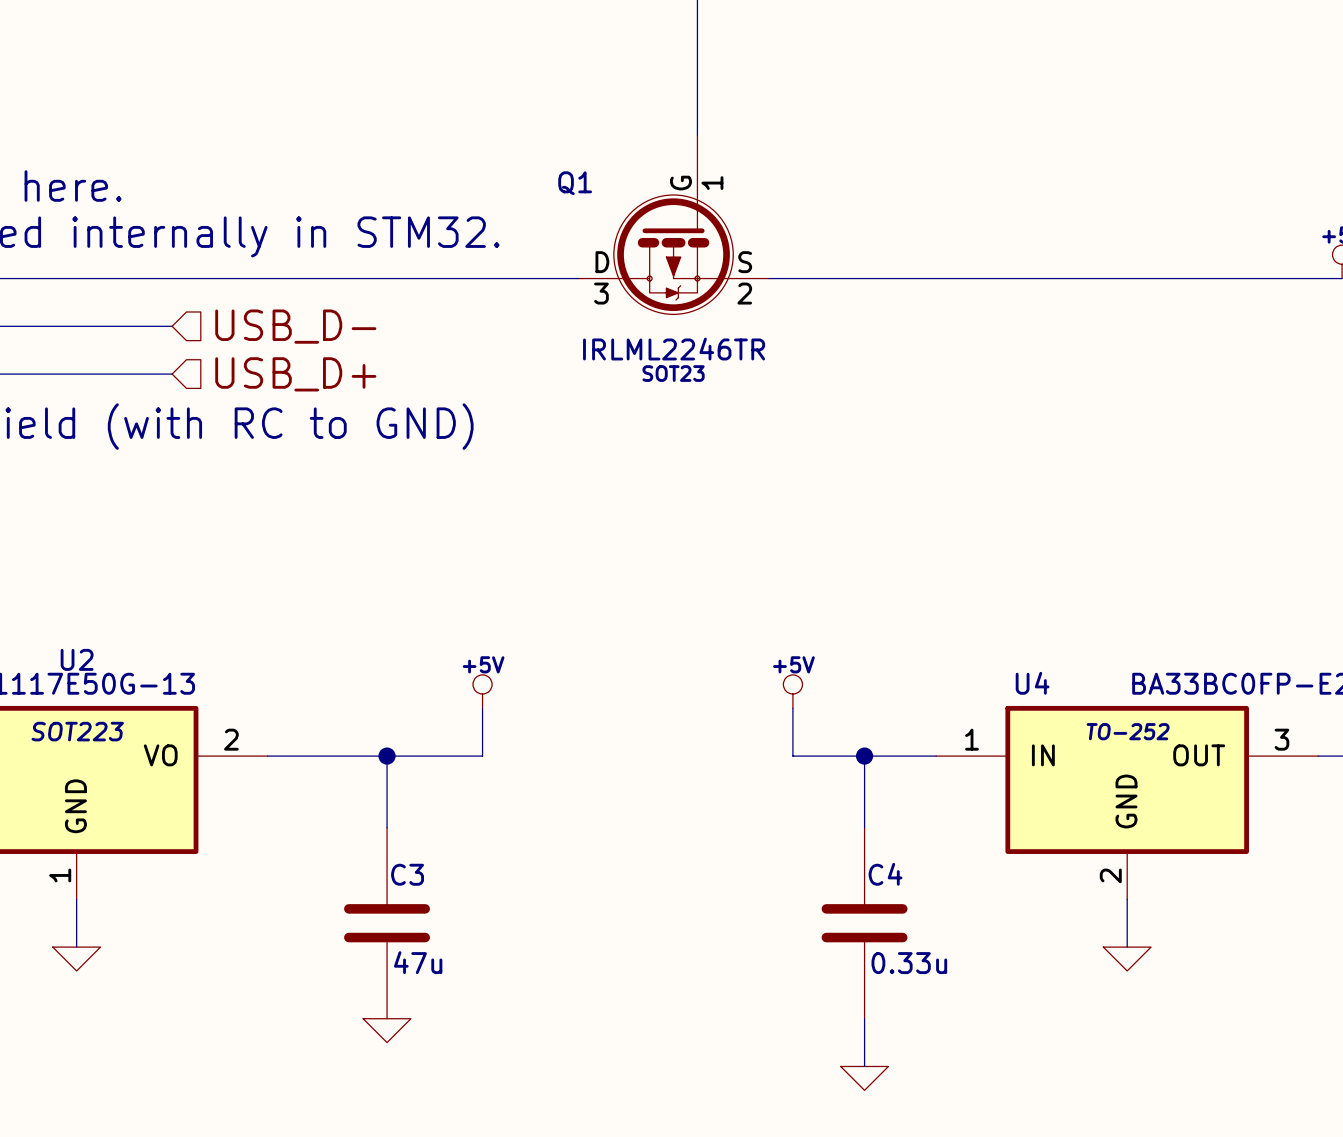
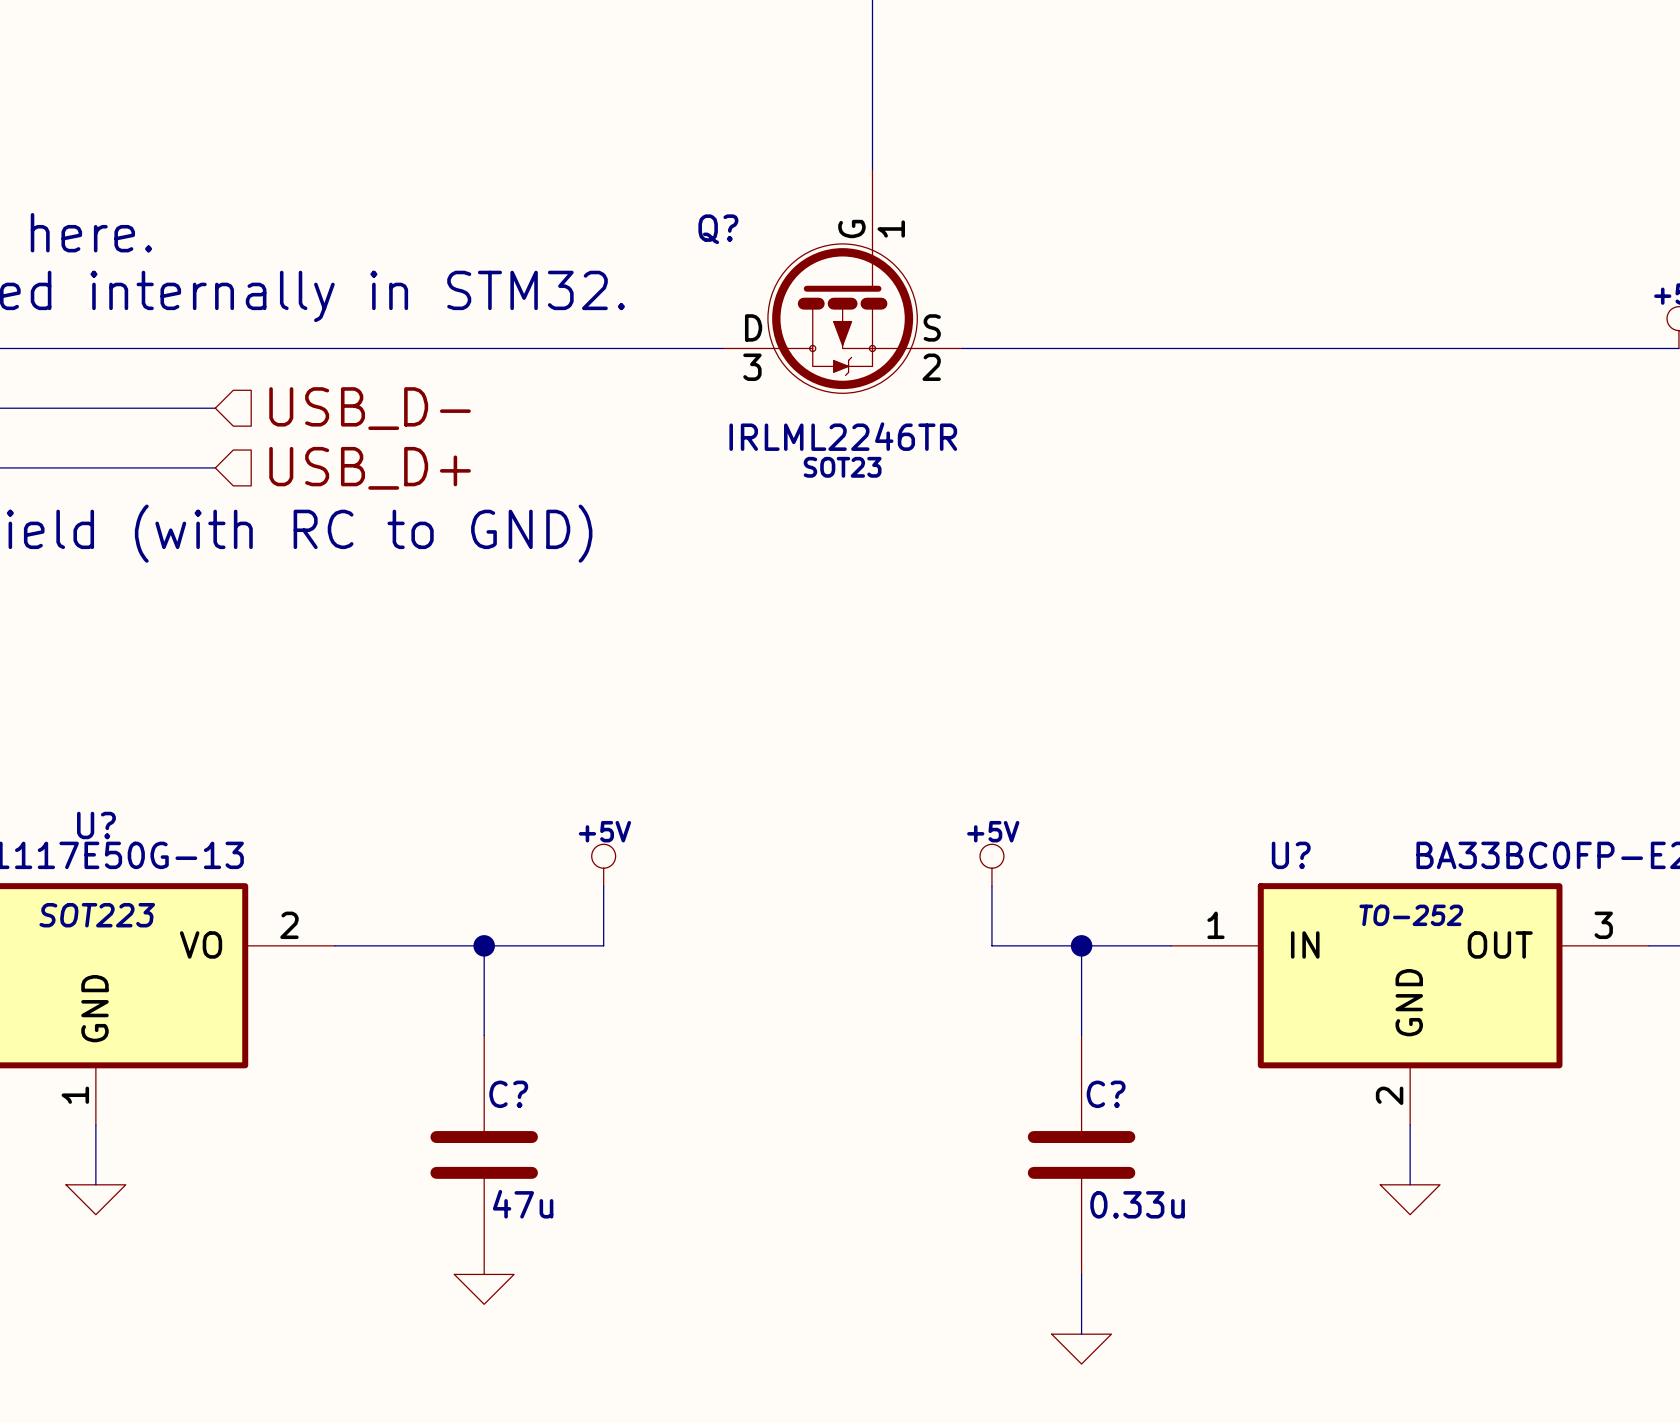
Q1 name: Q1 (575, 183) -> Q? (718, 229)
U2 name: U2 (77, 659) -> U? (96, 825)
U4 name: U4 (1032, 683) -> U? (1291, 855)
C3 name: C3 (407, 874) -> C? (508, 1094)
C4 name: C4 (885, 874) -> C? (1106, 1094)

